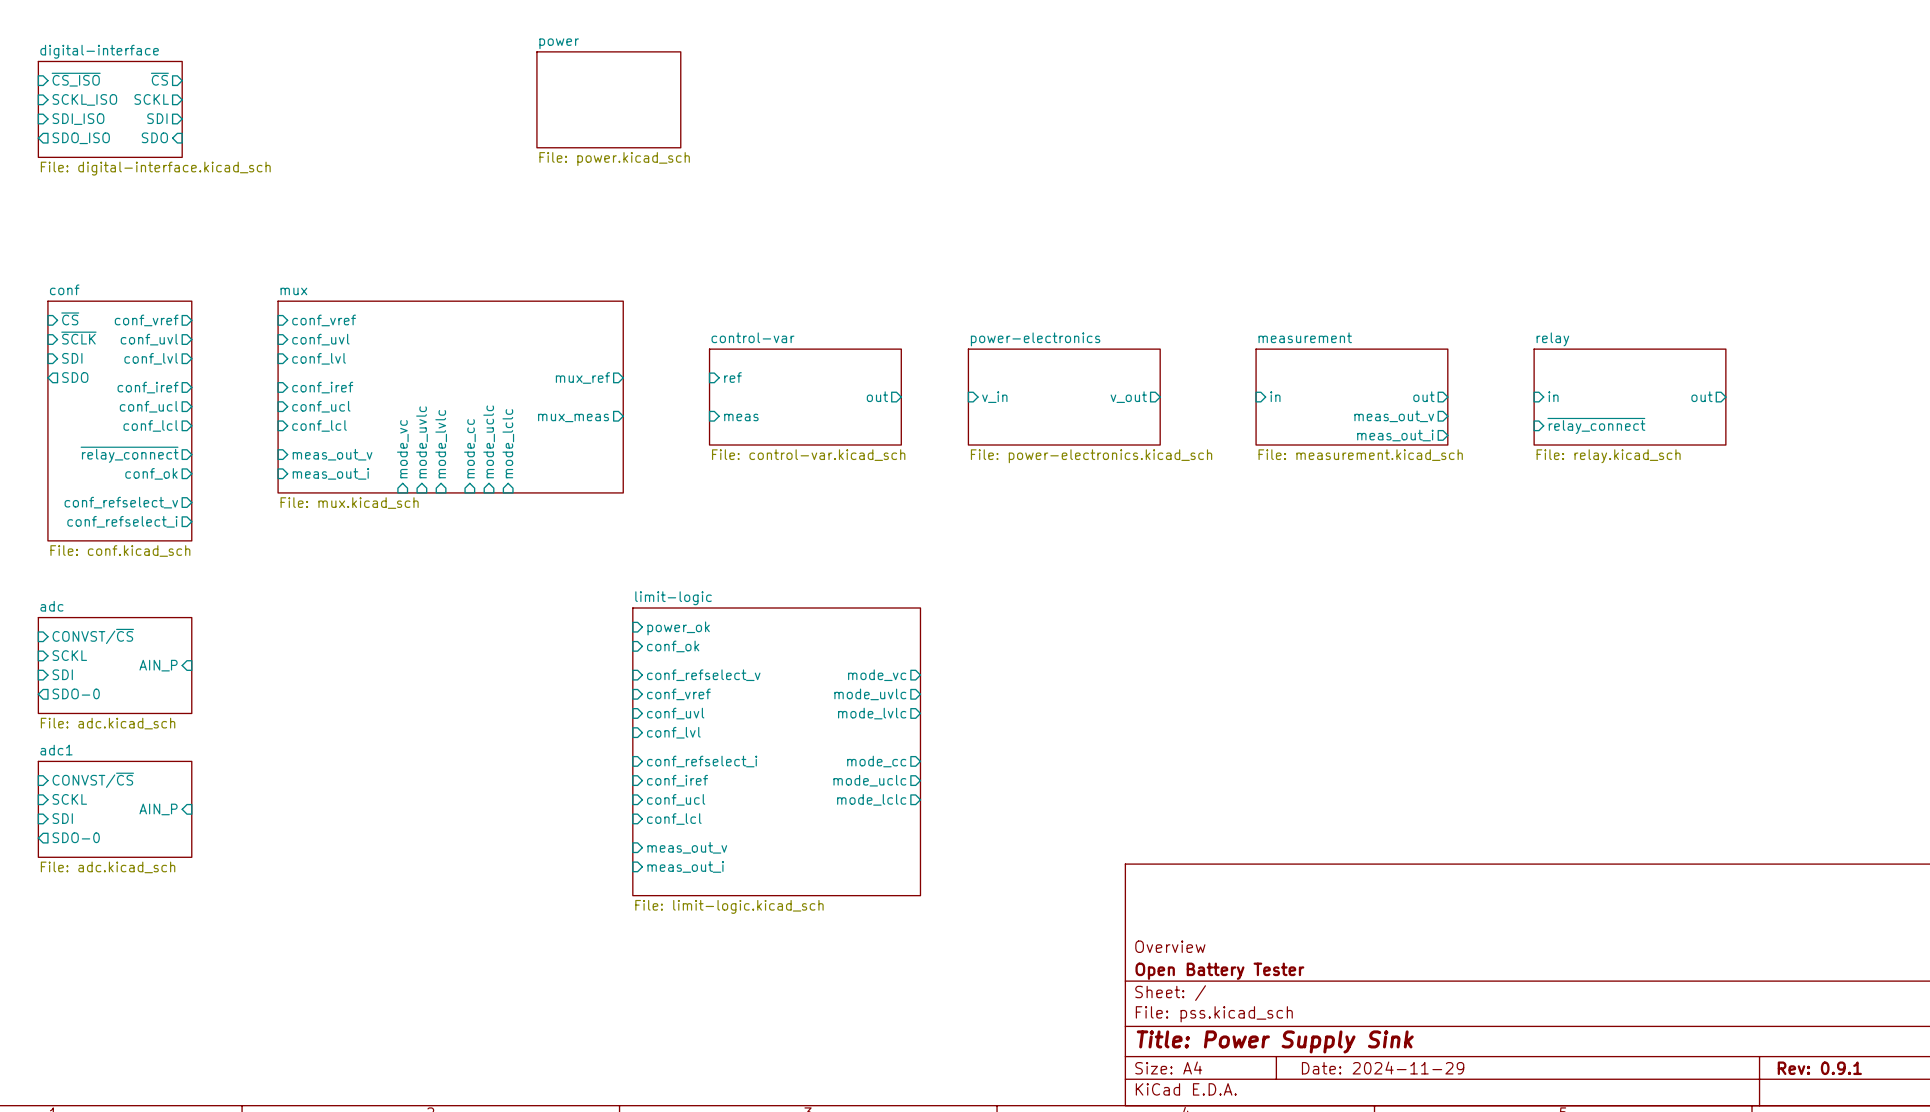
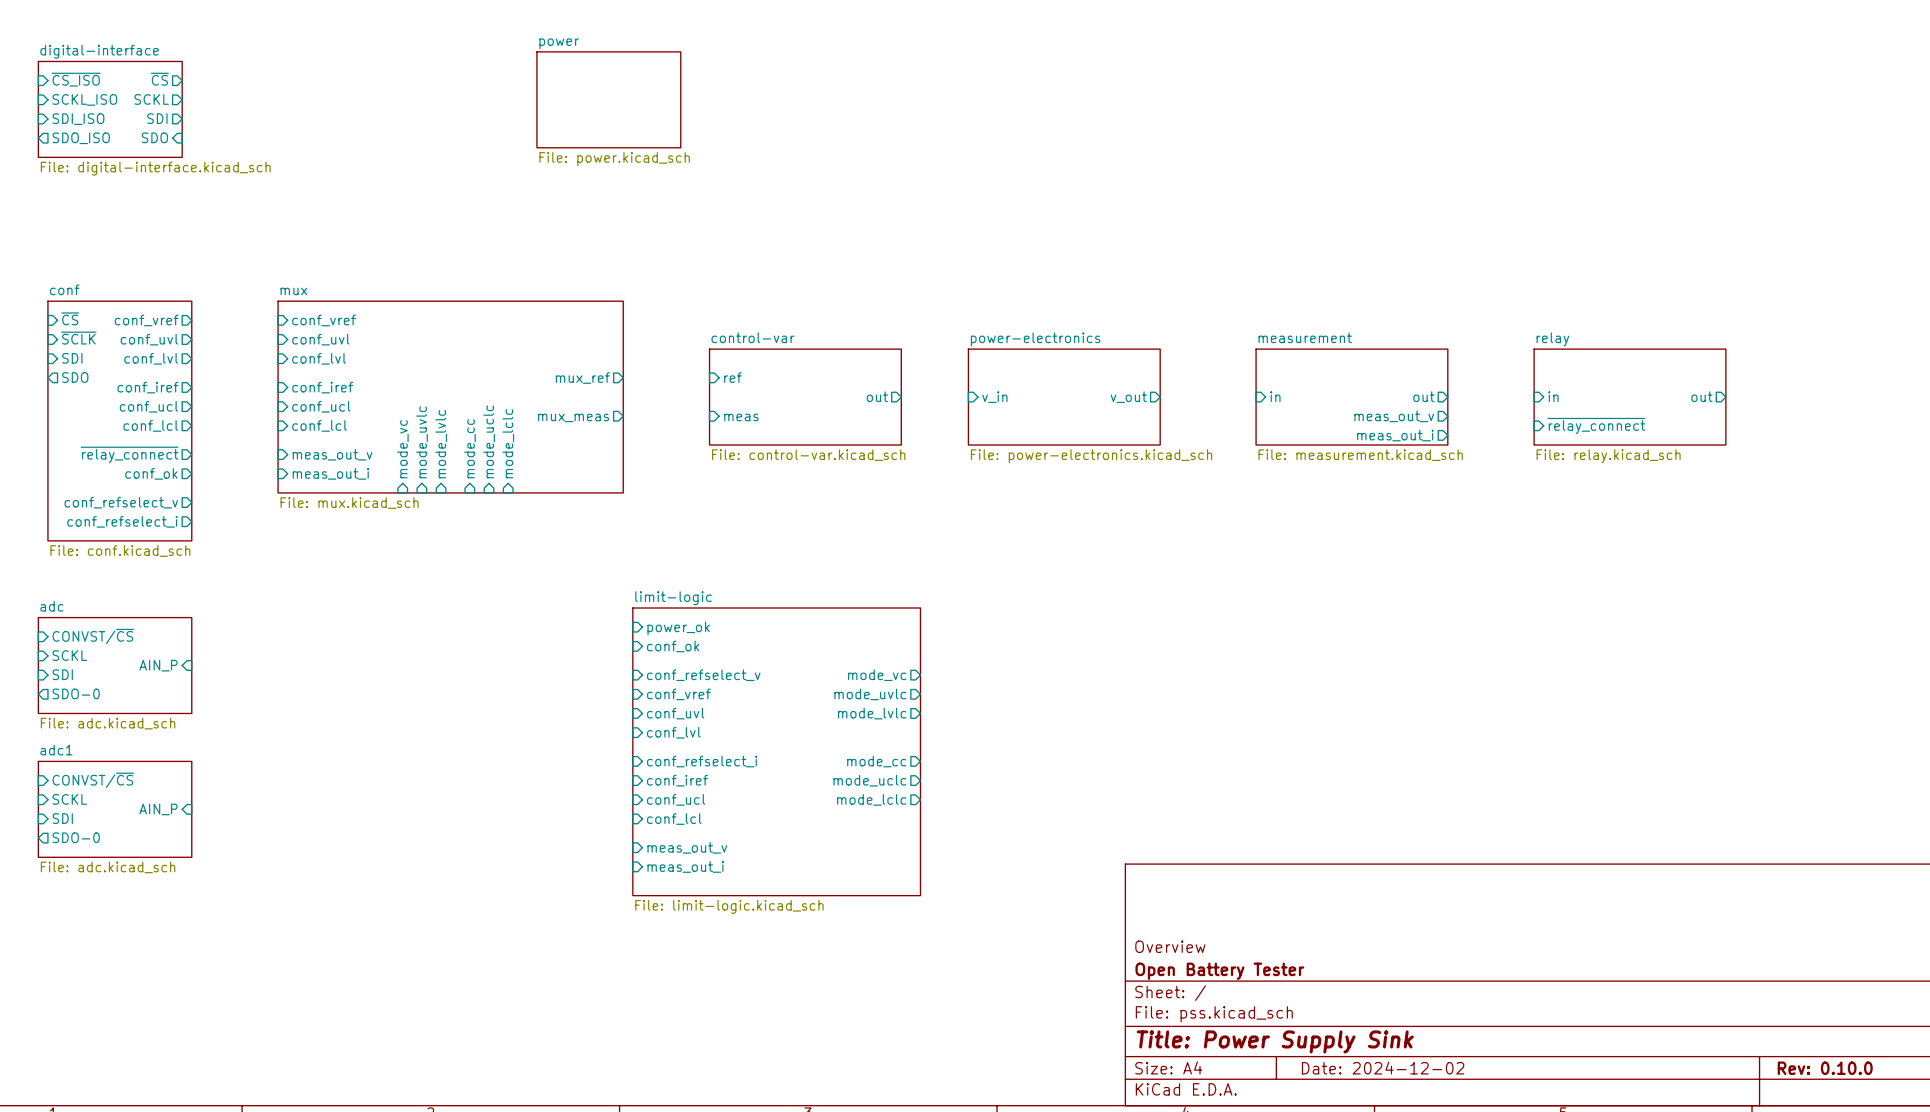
title block: Date: 2024-11-29 (1383, 1067) -> Date: 2024-12-02 (1383, 1067)
title block: Rev: 0.9.1 (1819, 1068) -> Rev: 0.10.0 (1825, 1068)

